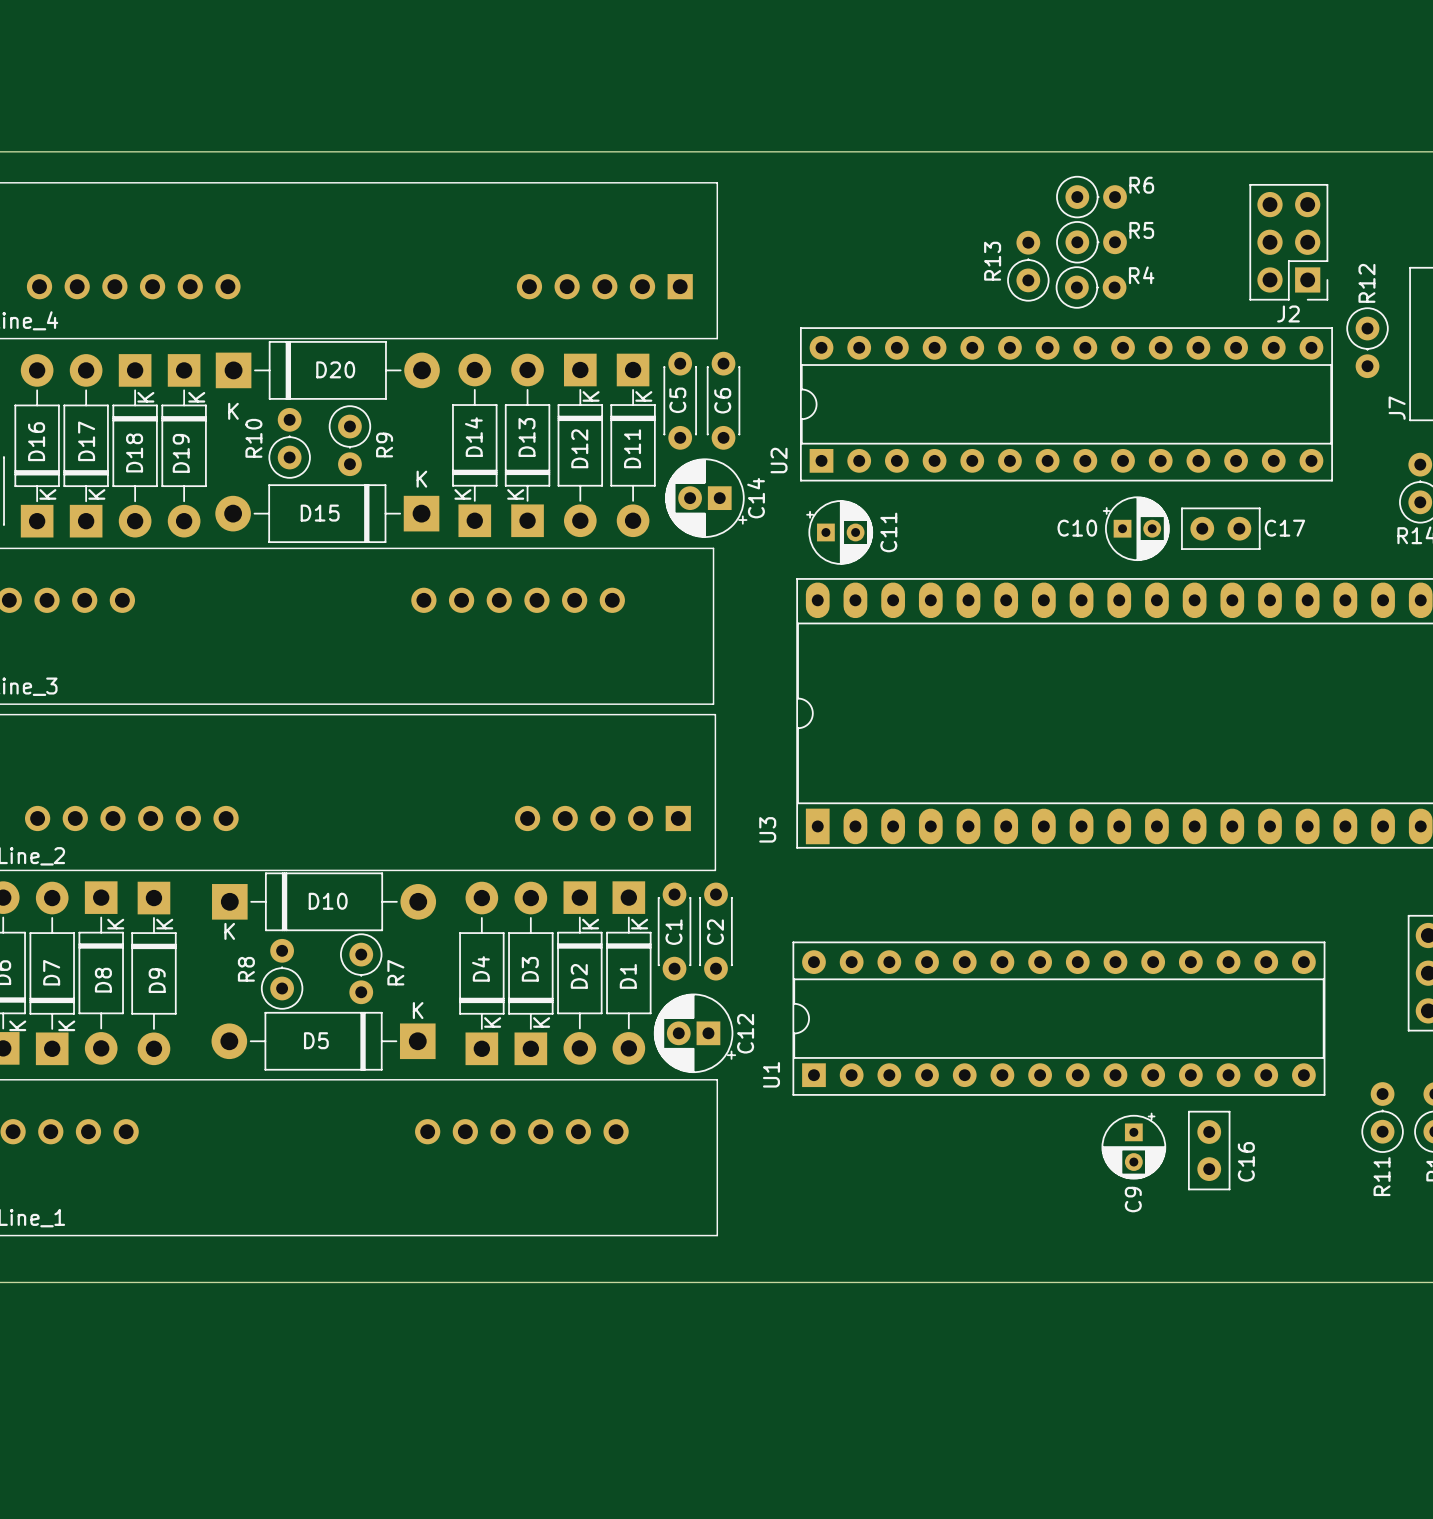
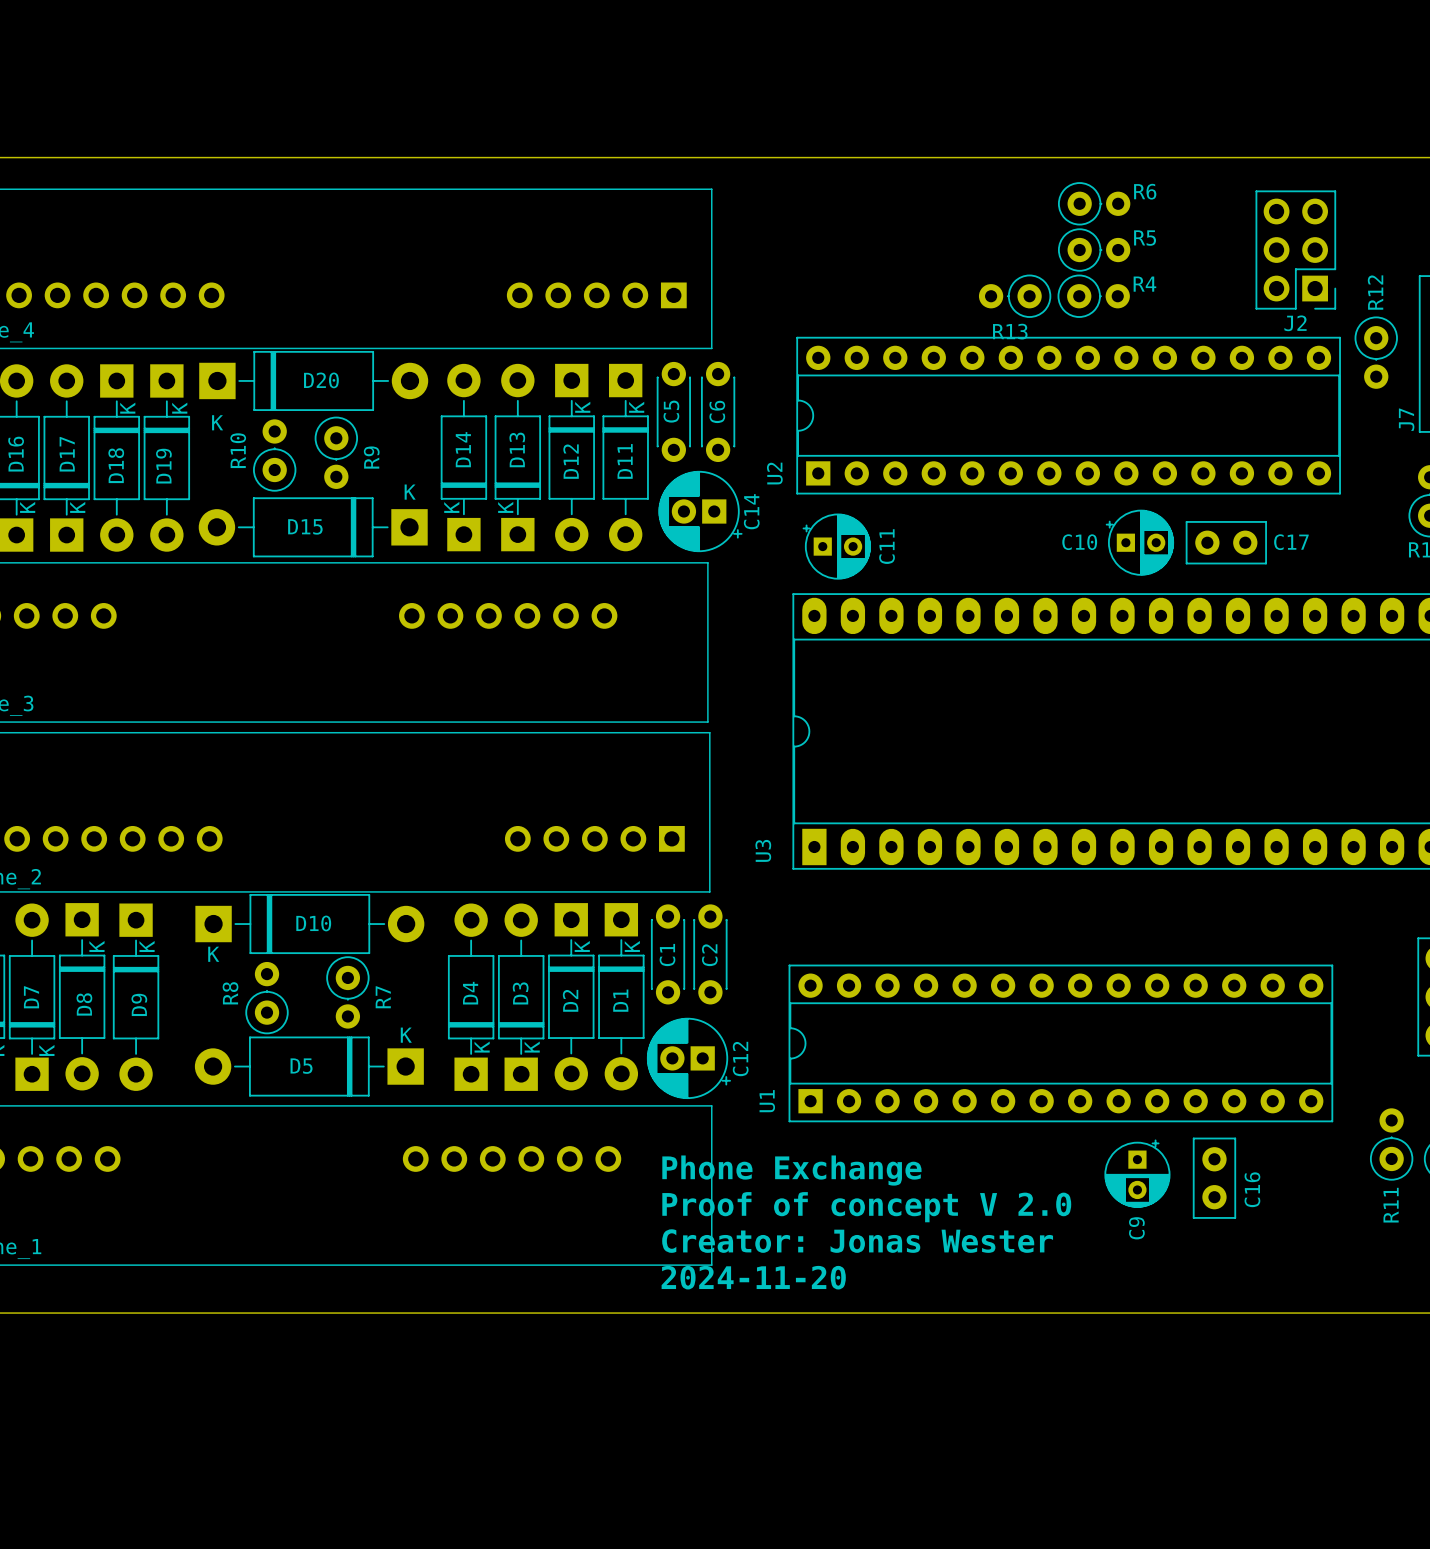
R13 rotation: 0° (1028, 266) -> 90° counterclockwise (1015, 296)
text: none -> Phone Exchange (791, 1170)
text: none -> Proof of concept V 2.0 (866, 1207)
text: none -> Creator: Jonas Wester (857, 1241)
text: none -> 2024-11-20 (753, 1277)

